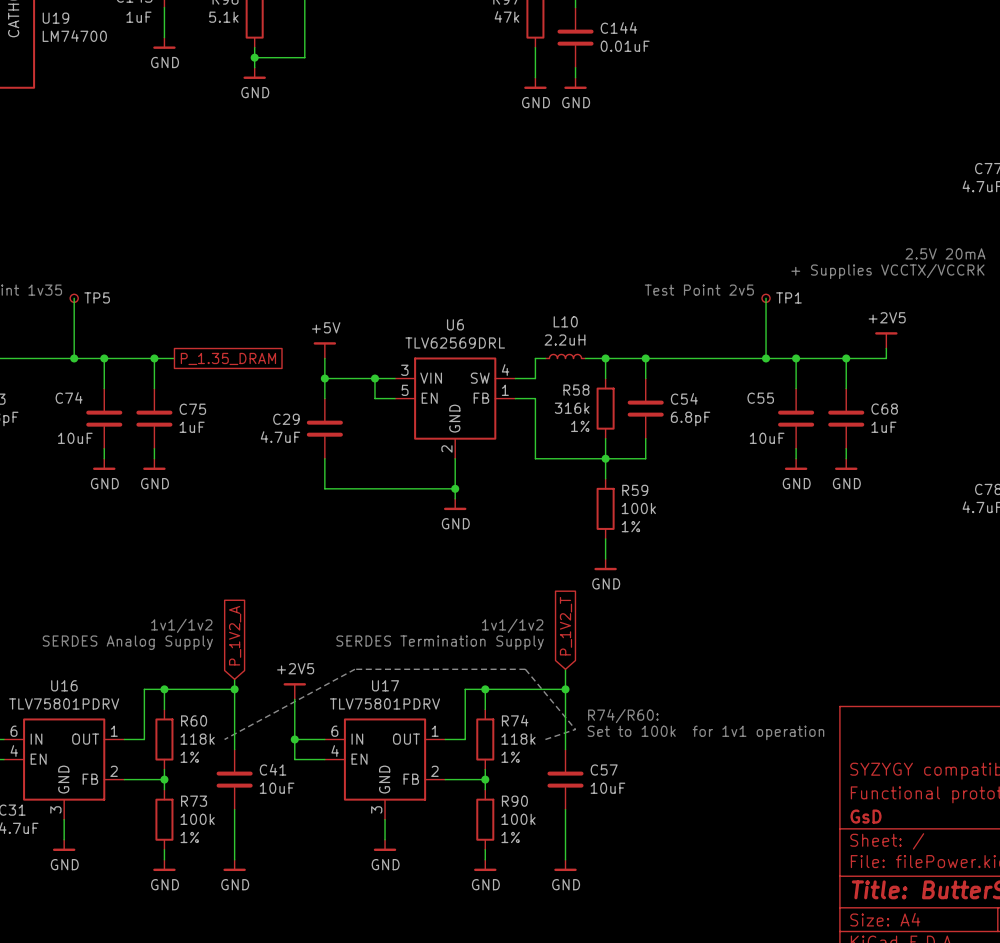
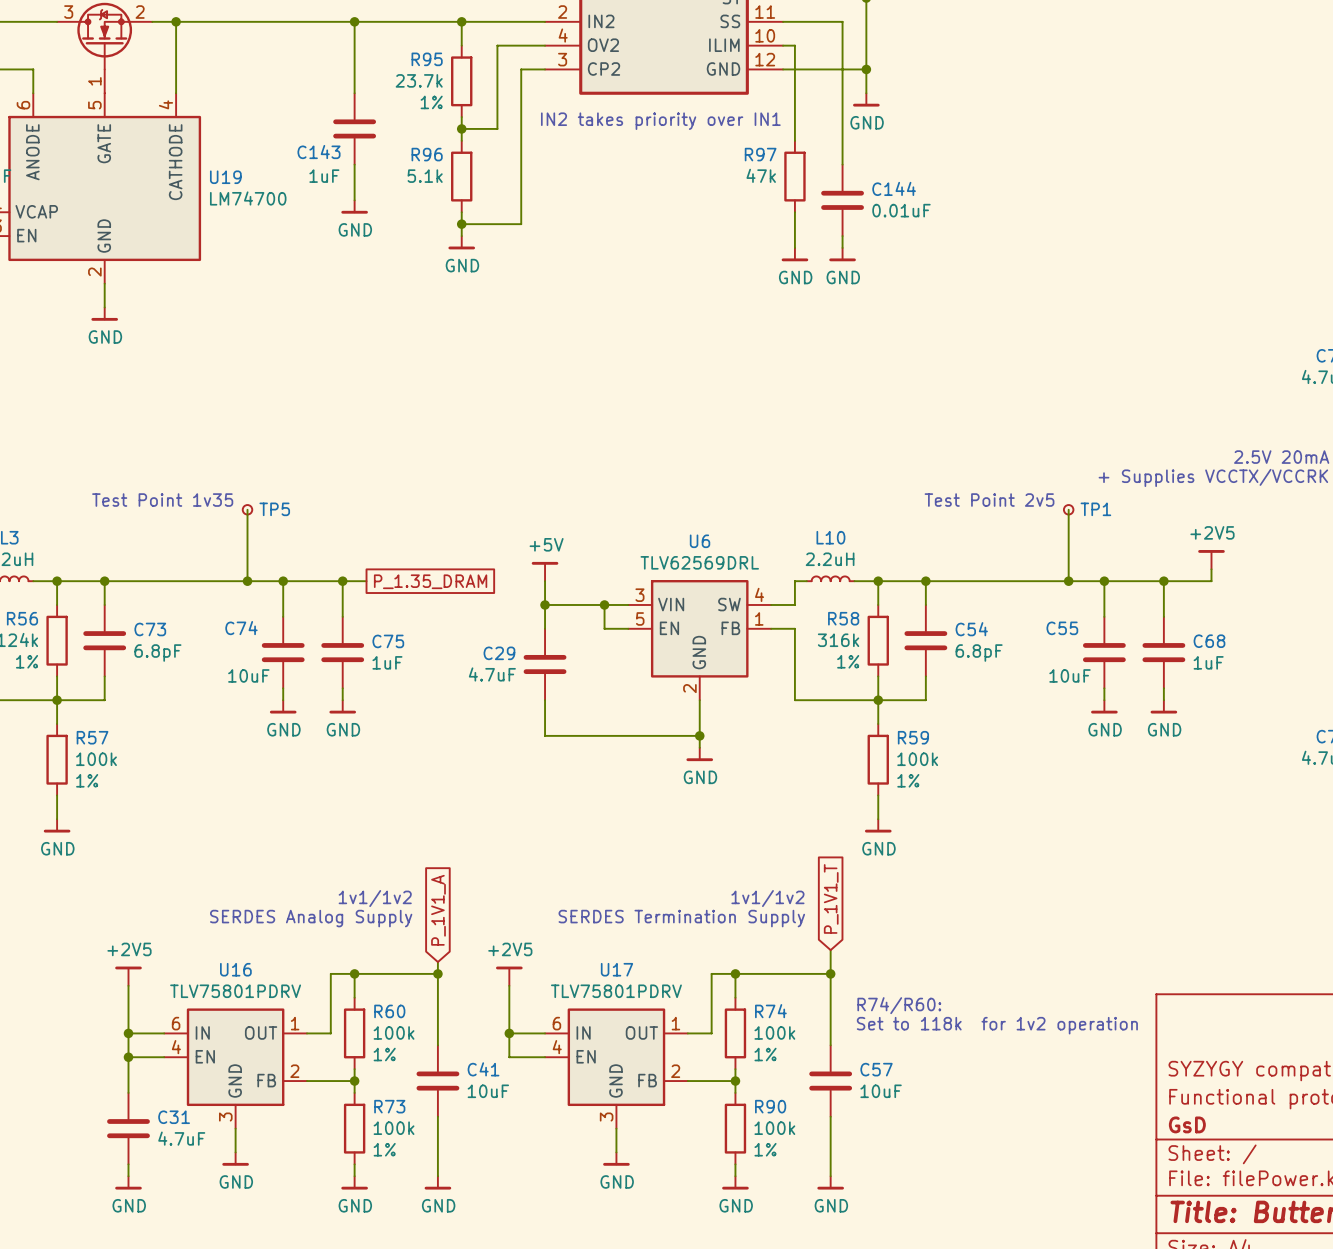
global label: P_1V2_T (565, 626) -> P_1V1_T (831, 898)
global label: P_1V2_A (235, 635) -> P_1V1_A (438, 910)
text: Set to 100k for 1v1 operation (705, 732) -> Set to 118k for 1v2 operation (997, 1025)
R60 value: 118k (197, 739) -> 100k (394, 1032)
line: (224, 739) (354, 669) (525, 669) (575, 729) (545, 739) -> none
R74 value: 118k (518, 739) -> 100k (774, 1032)

